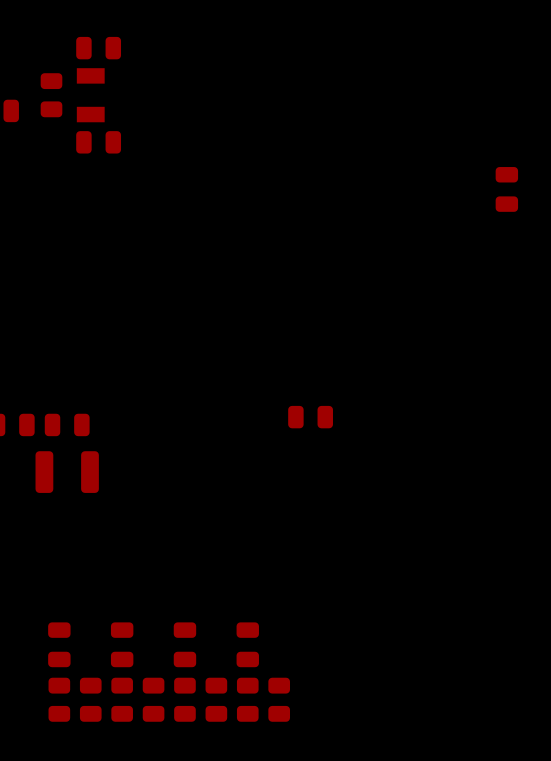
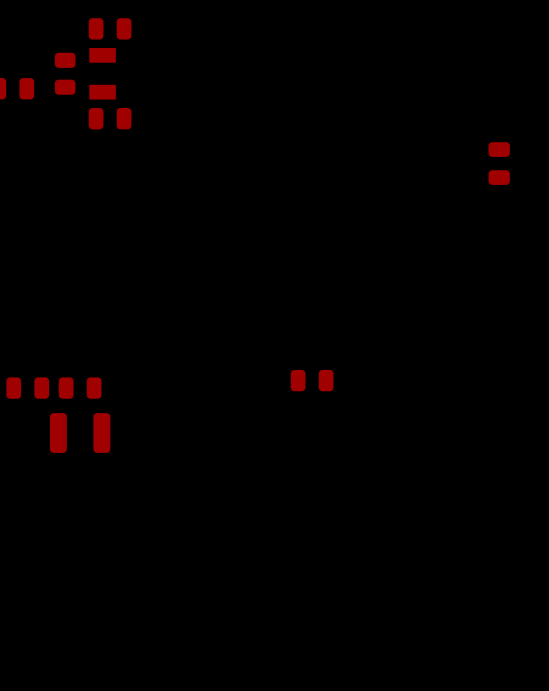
part: (59, 644) -> none
part: (122, 644) -> none
part: (184, 644) -> none
part: (247, 644) -> none
part: (59, 699) -> none
part: (90, 699) -> none
part: (122, 699) -> none
part: (153, 699) -> none
part: (184, 699) -> none
part: (216, 699) -> none
part: (247, 699) -> none
part: (279, 699) -> none

